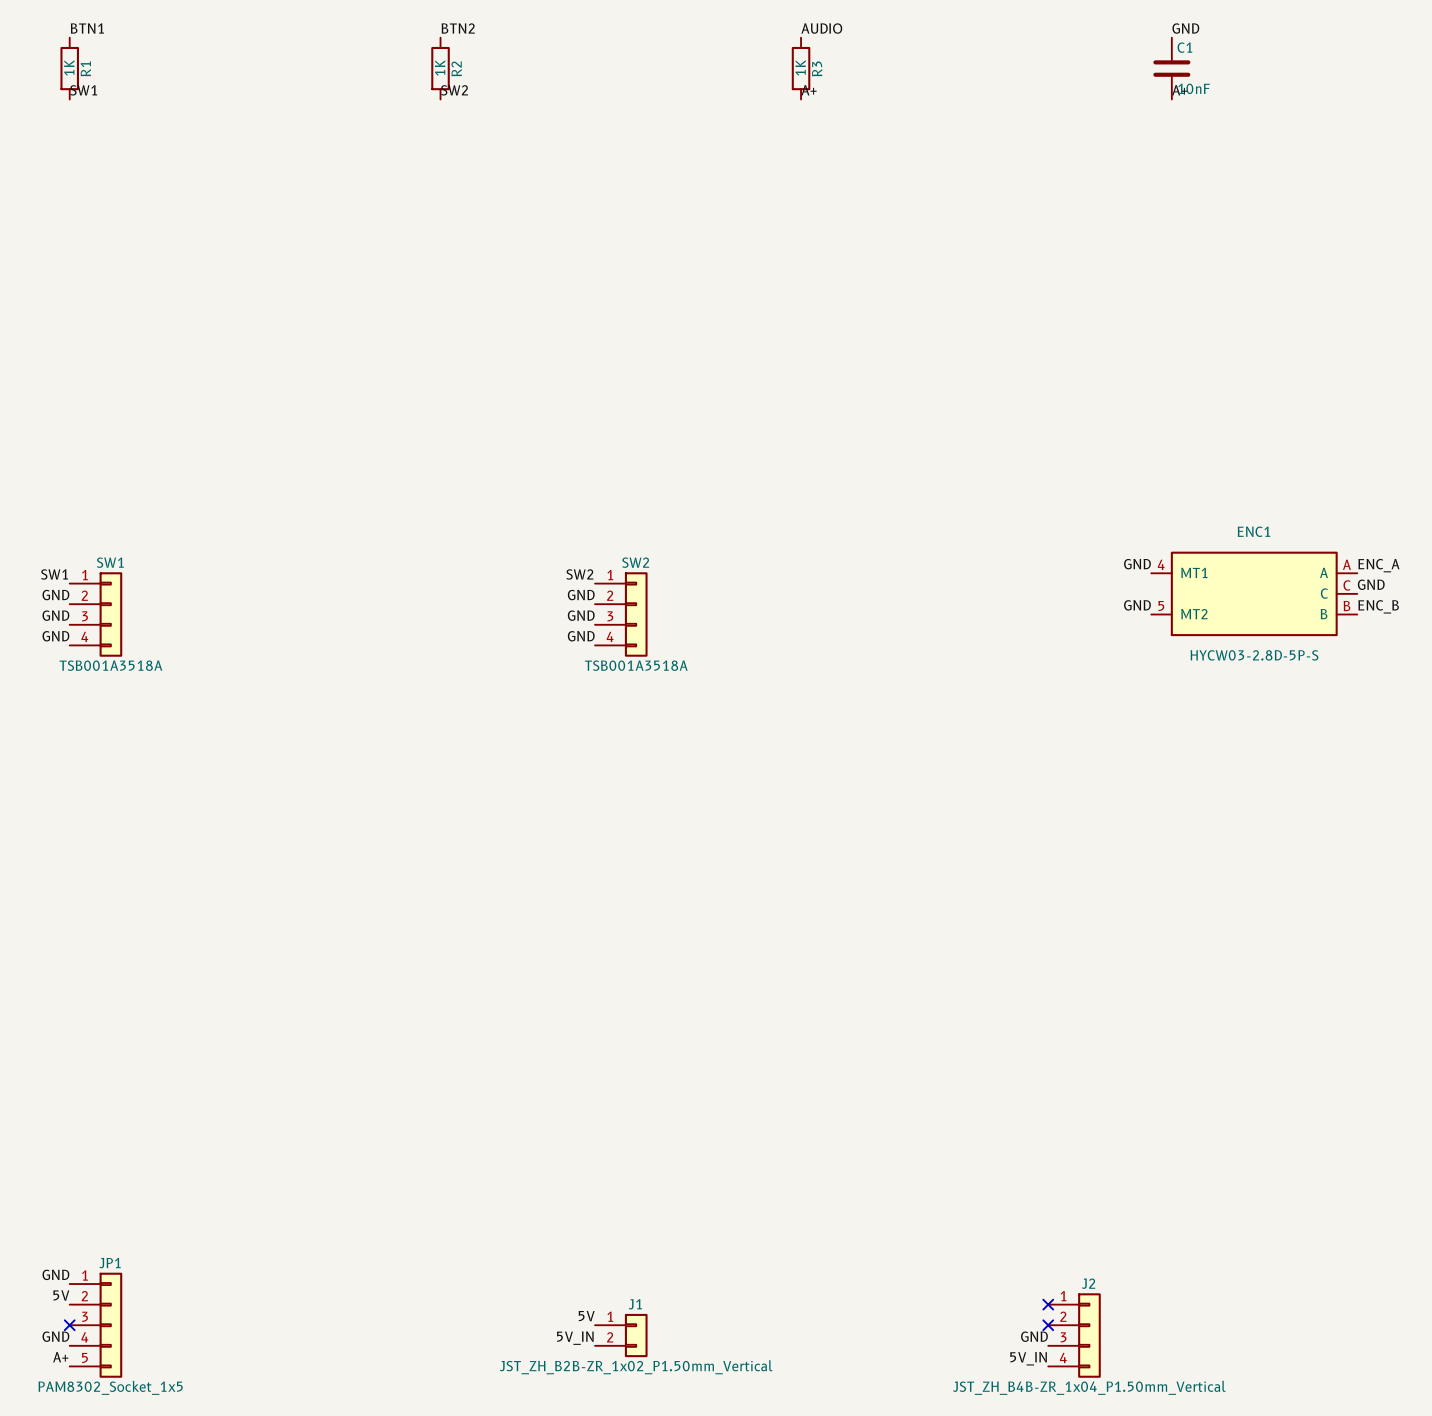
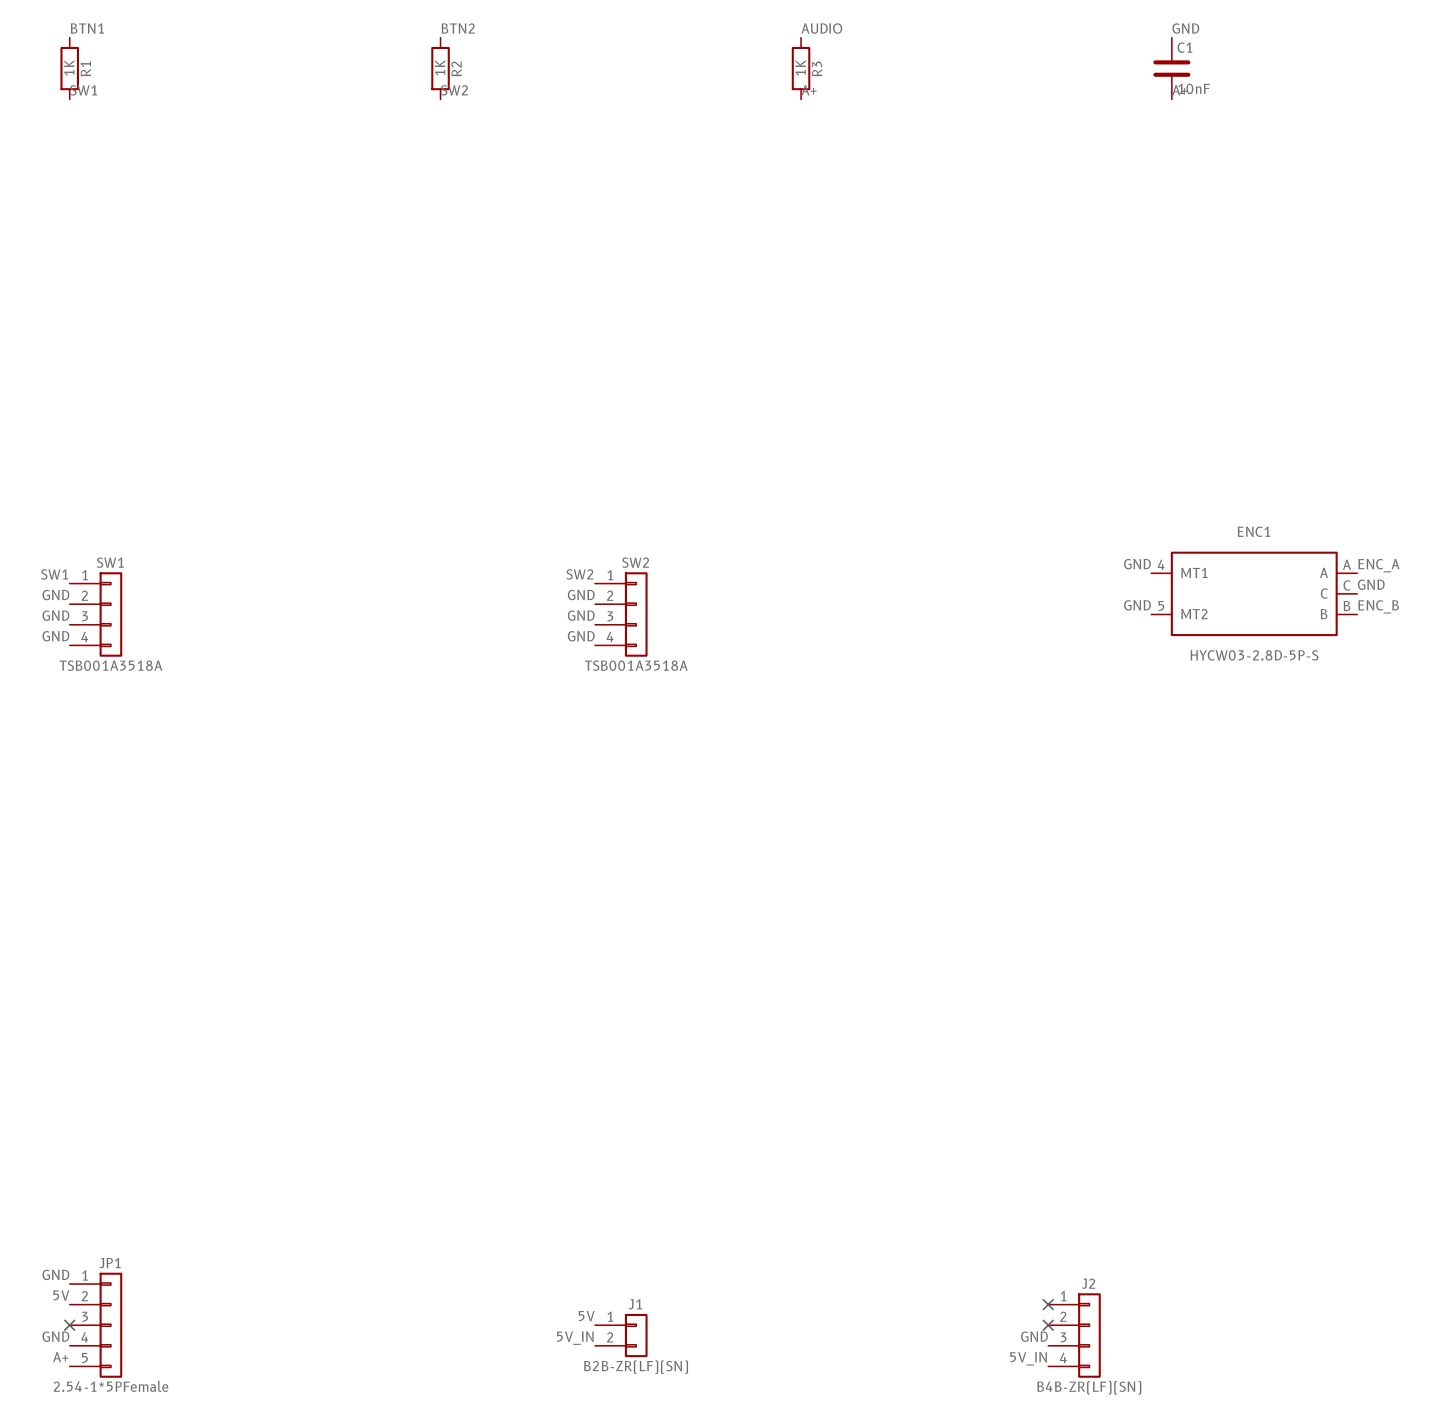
J1 value: JST_ZH_B2B-ZR_1x02_P1.50mm_Vertical (636, 1367) -> B2B-ZR(LF)(SN) (636, 1367)
JP1 value: PAM8302_Socket_1x5 (110, 1387) -> 2.54-1*5PFemale (111, 1386)
J2 value: JST_ZH_B4B-ZR_1x04_P1.50mm_Vertical (1089, 1387) -> B4B-ZR(LF)(SN) (1089, 1387)

